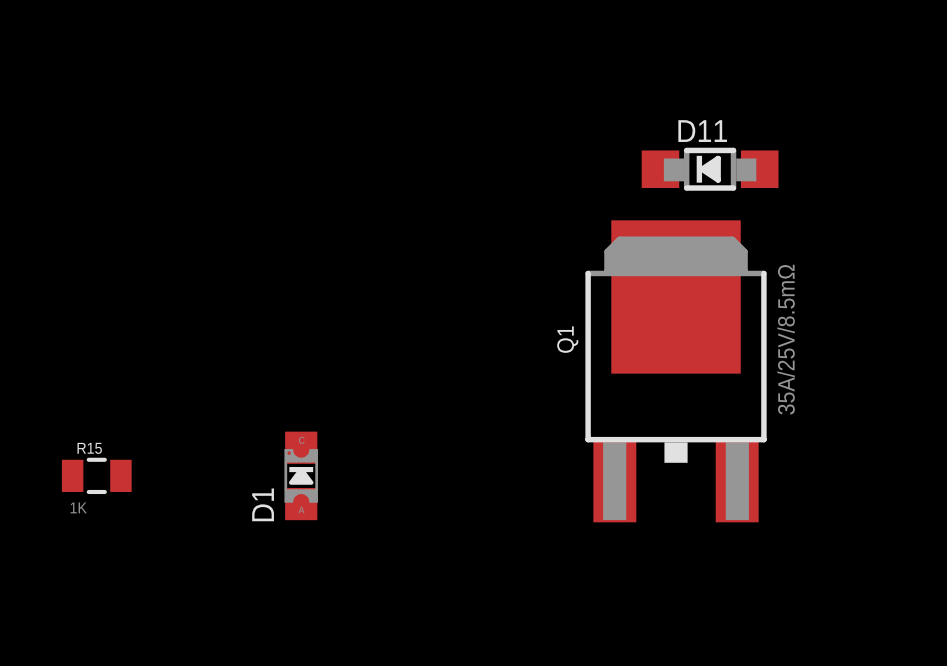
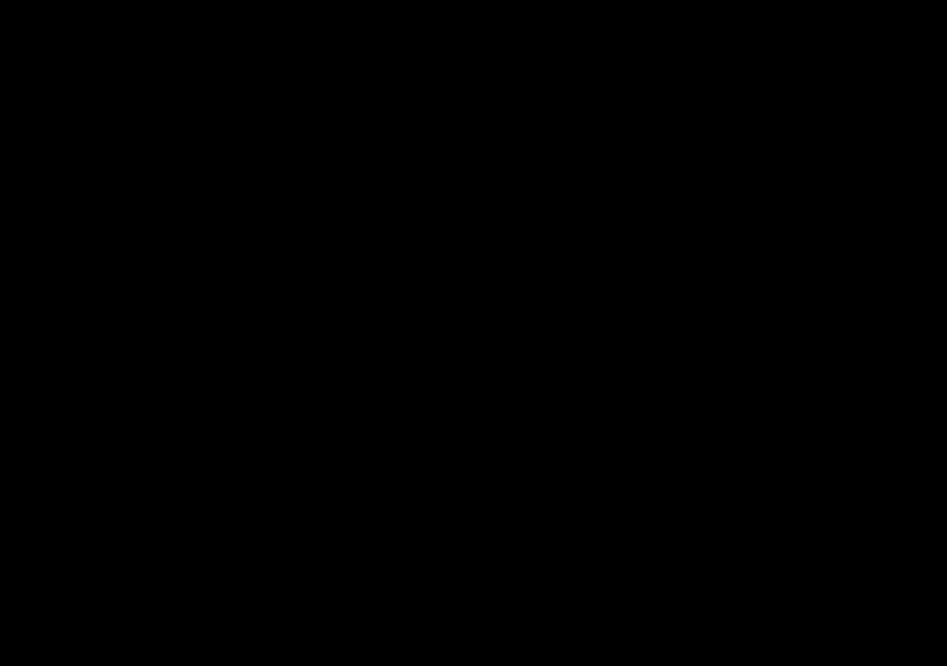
D11: (710, 169) -> none
Q1: 35A/25V/8.5mΩ (676, 371) -> none
R15: 1K (96, 475) -> none
D1: (301, 475) -> none

